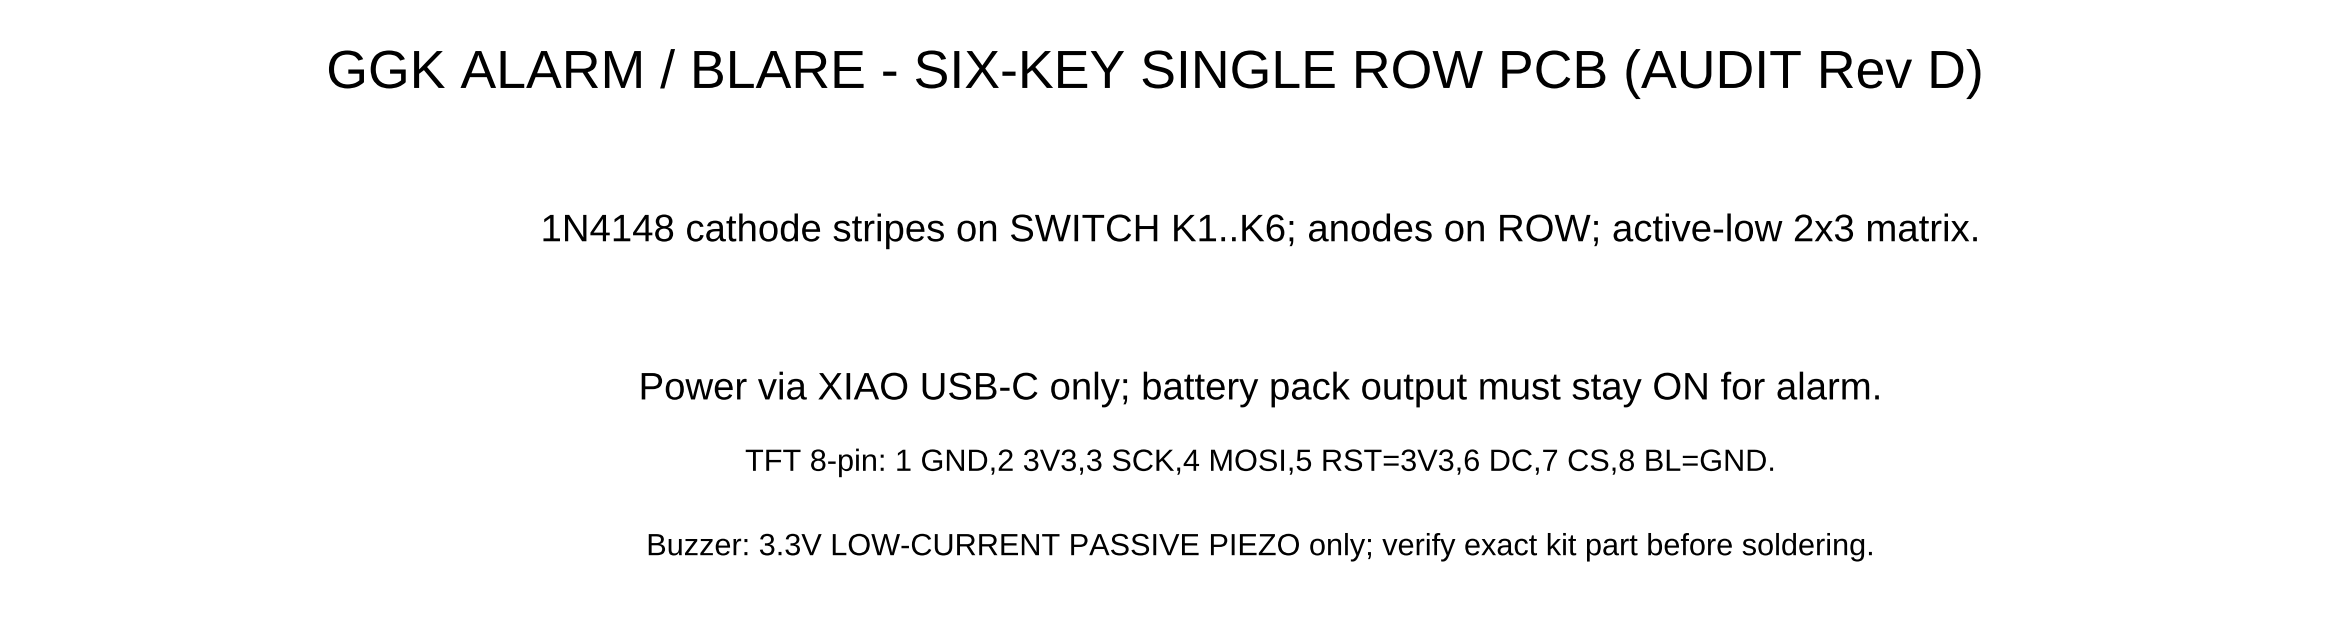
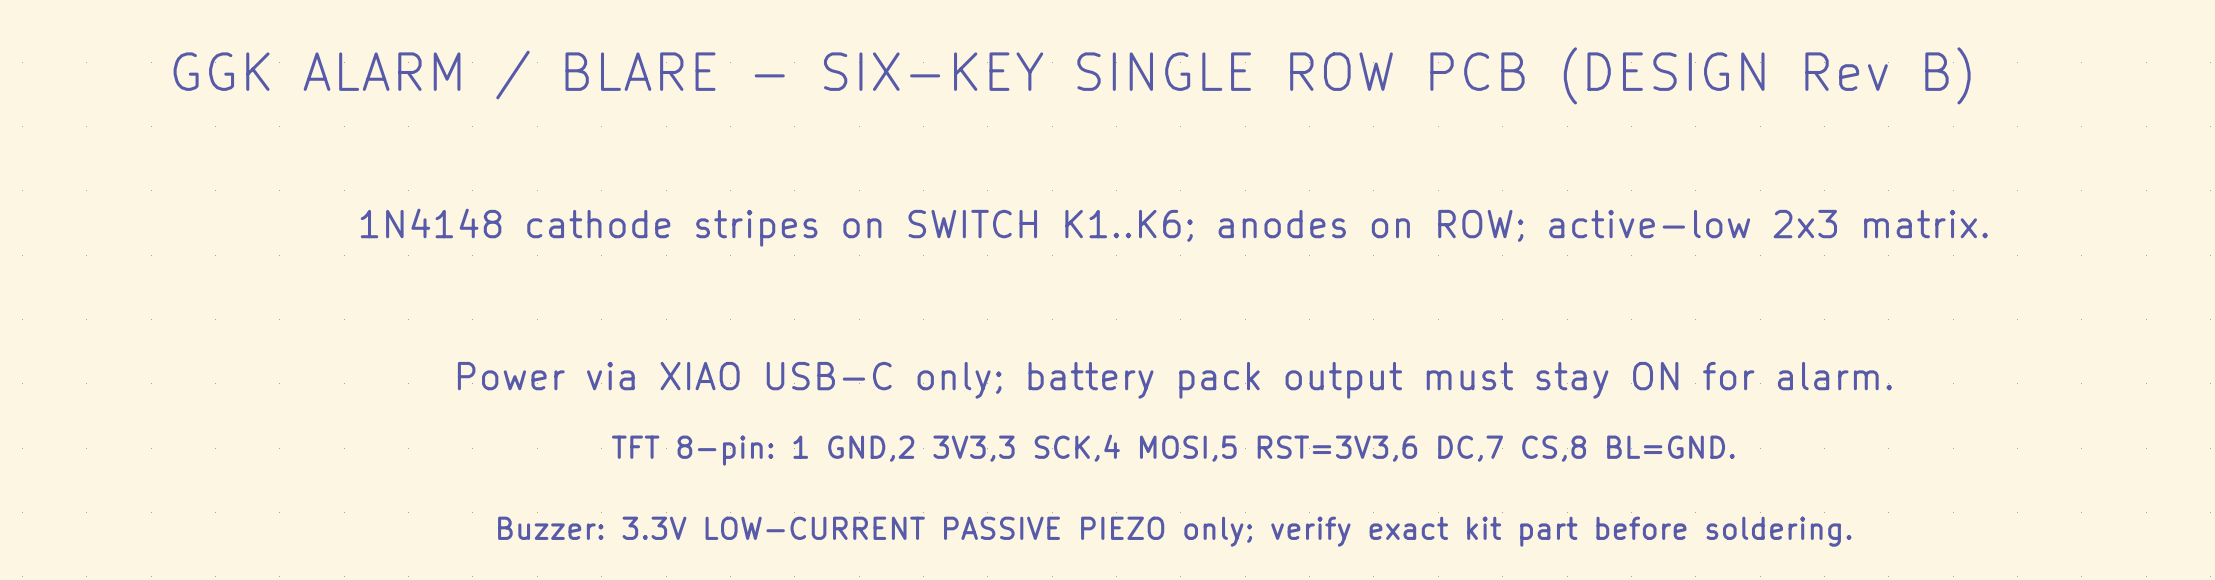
text: GGK ALARM / BLARE - SIX-KEY SINGLE ROW PCB (AUDIT Rev D) (1154, 74) -> GGK ALARM / BLARE - SIX-KEY SINGLE ROW PCB (DESIGN Rev B) (1072, 75)

